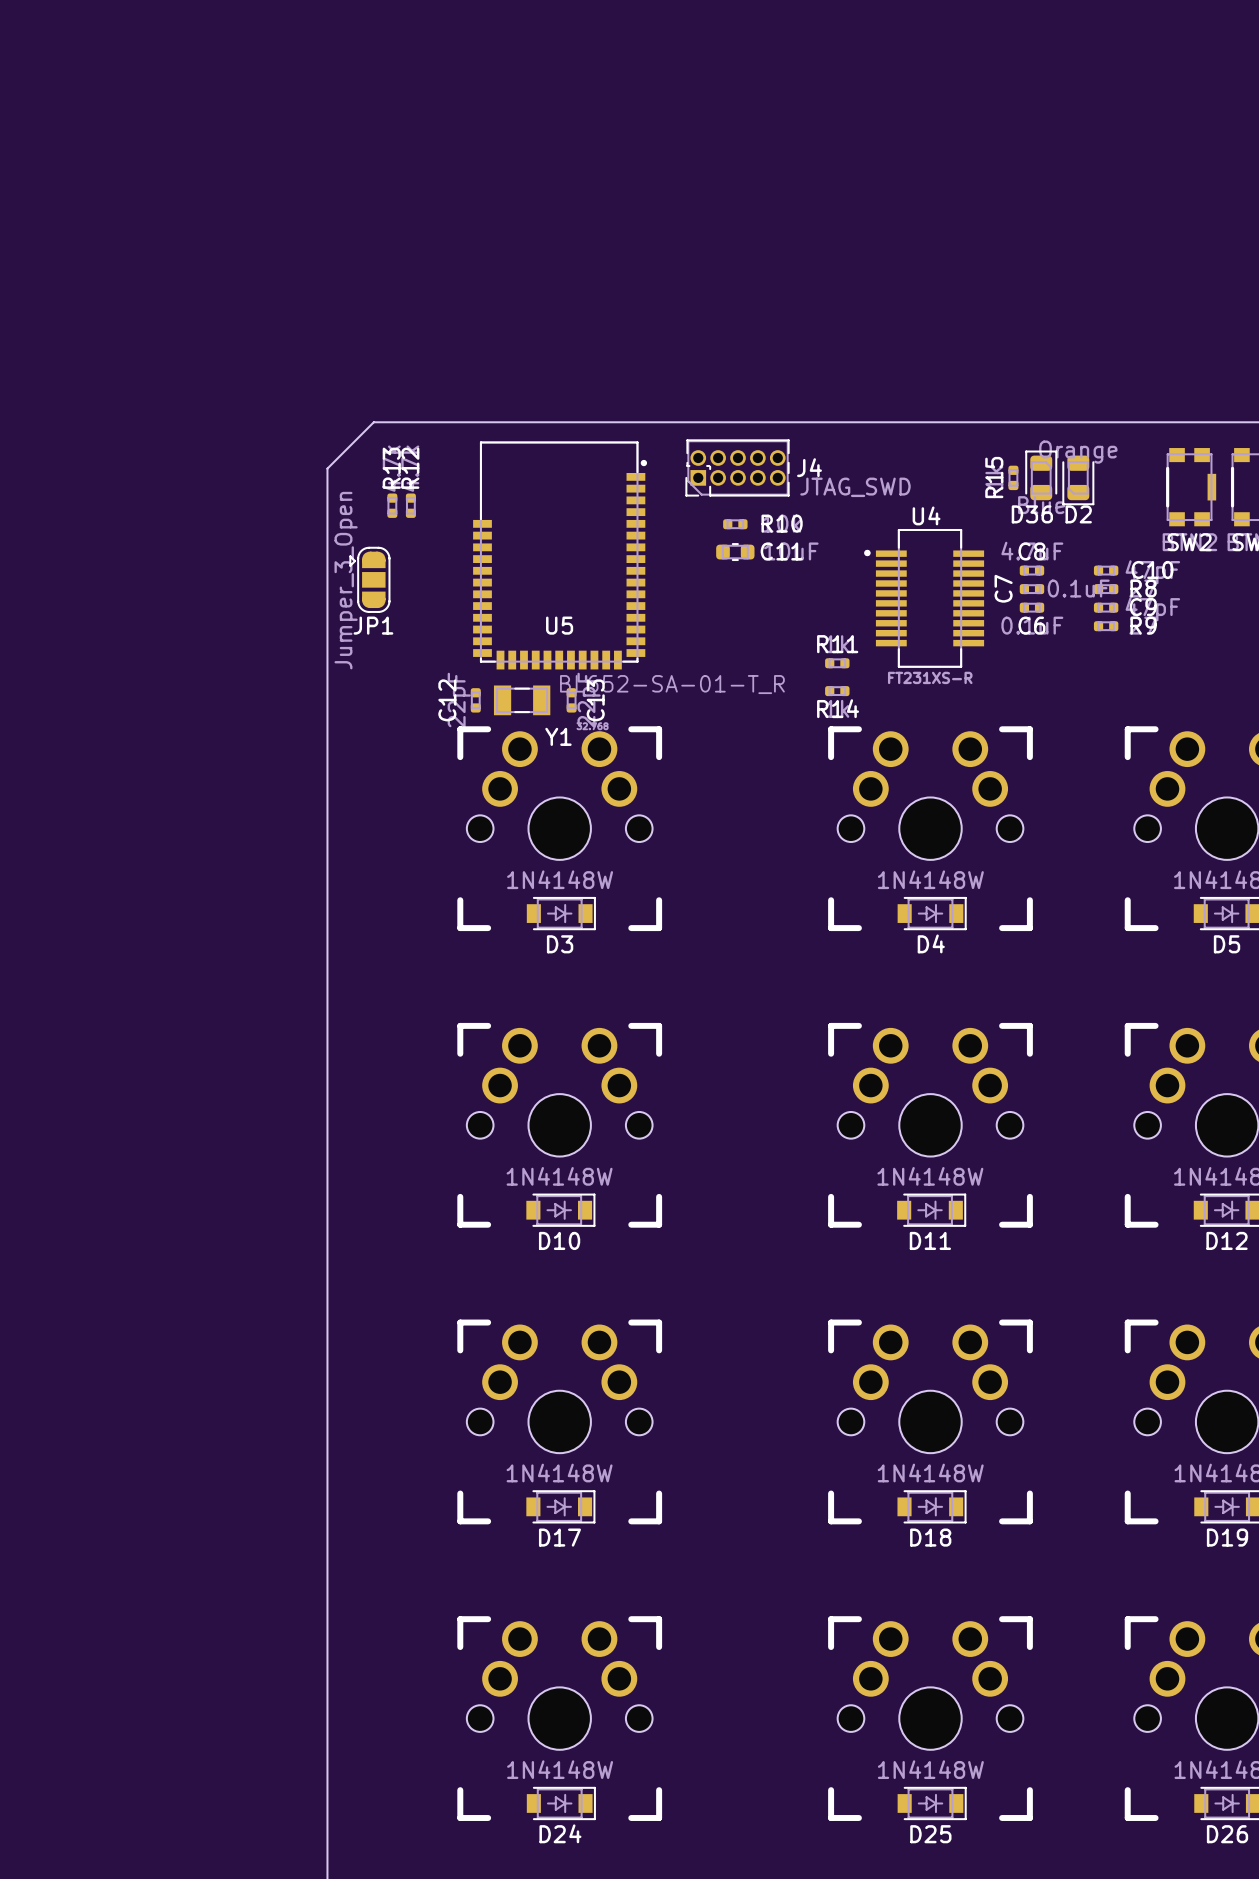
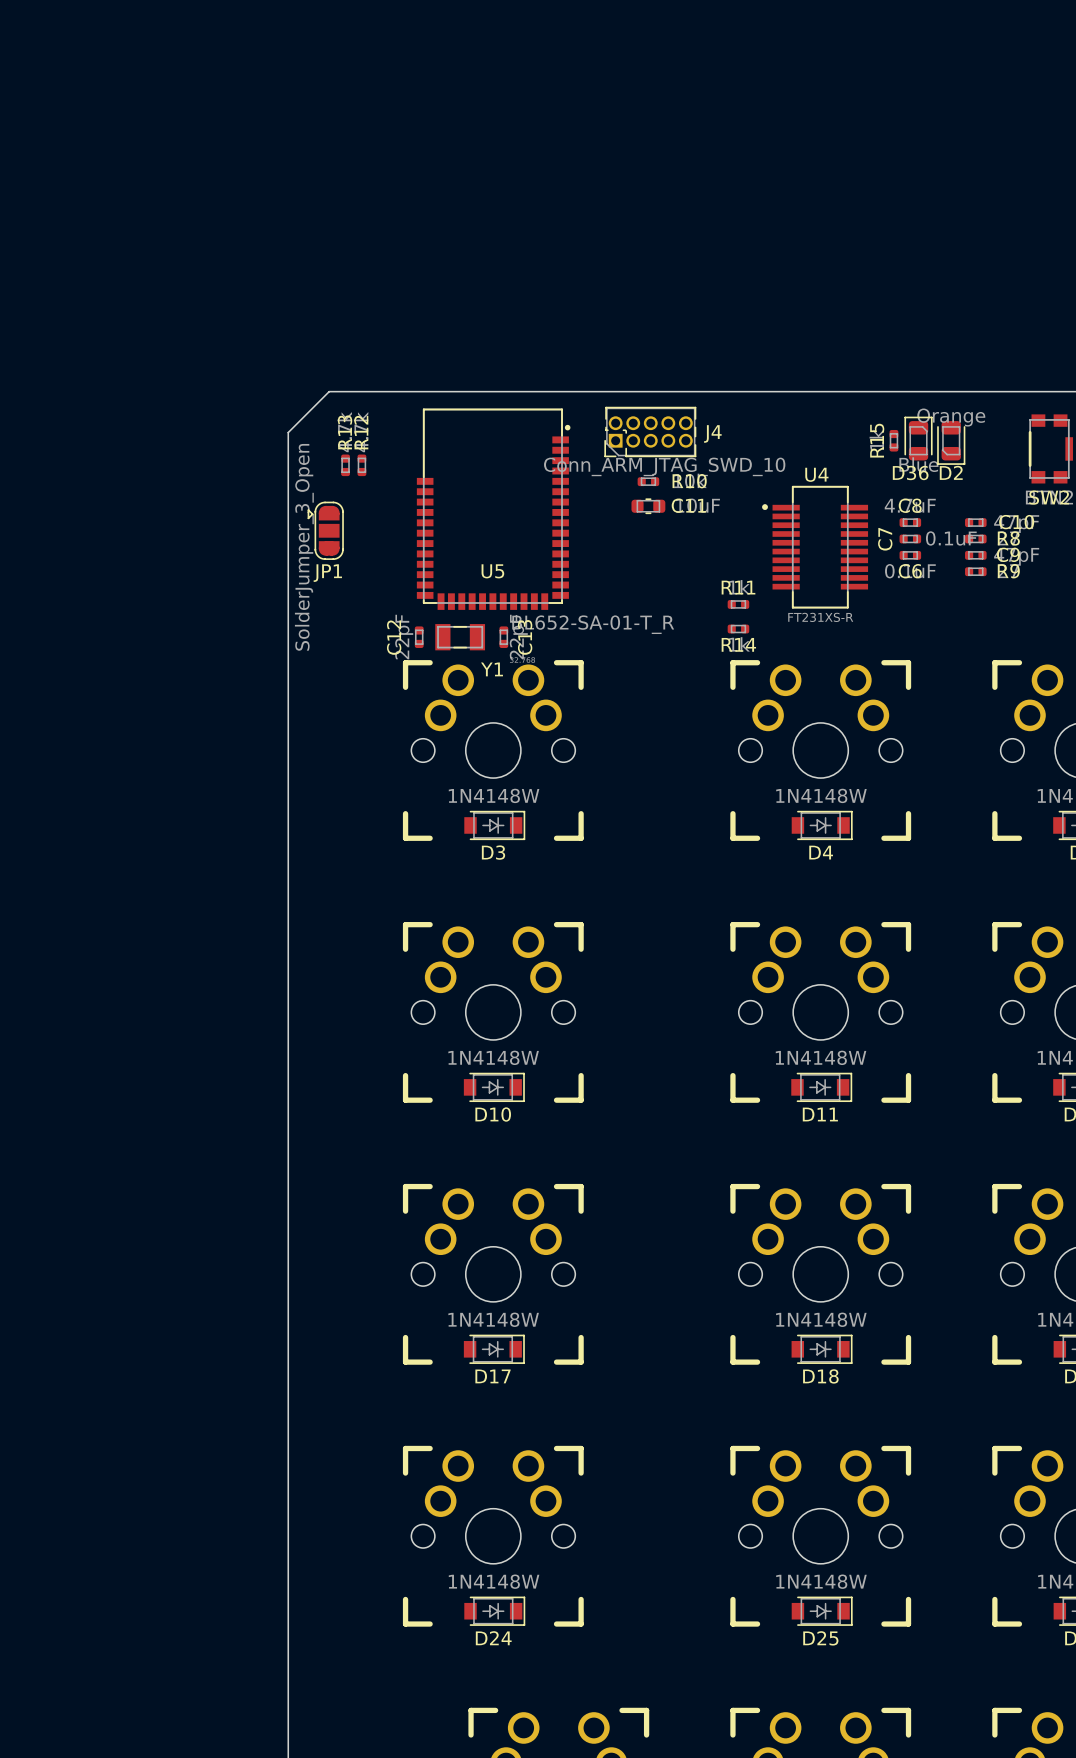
J4 value: JTAG_SWD (855, 487) -> Conn_ARM_JTAG_SWD_10 (664, 466)
JP1 value: Jumper_3_Open (346, 580) -> SolderJumper_3_Open (304, 547)

